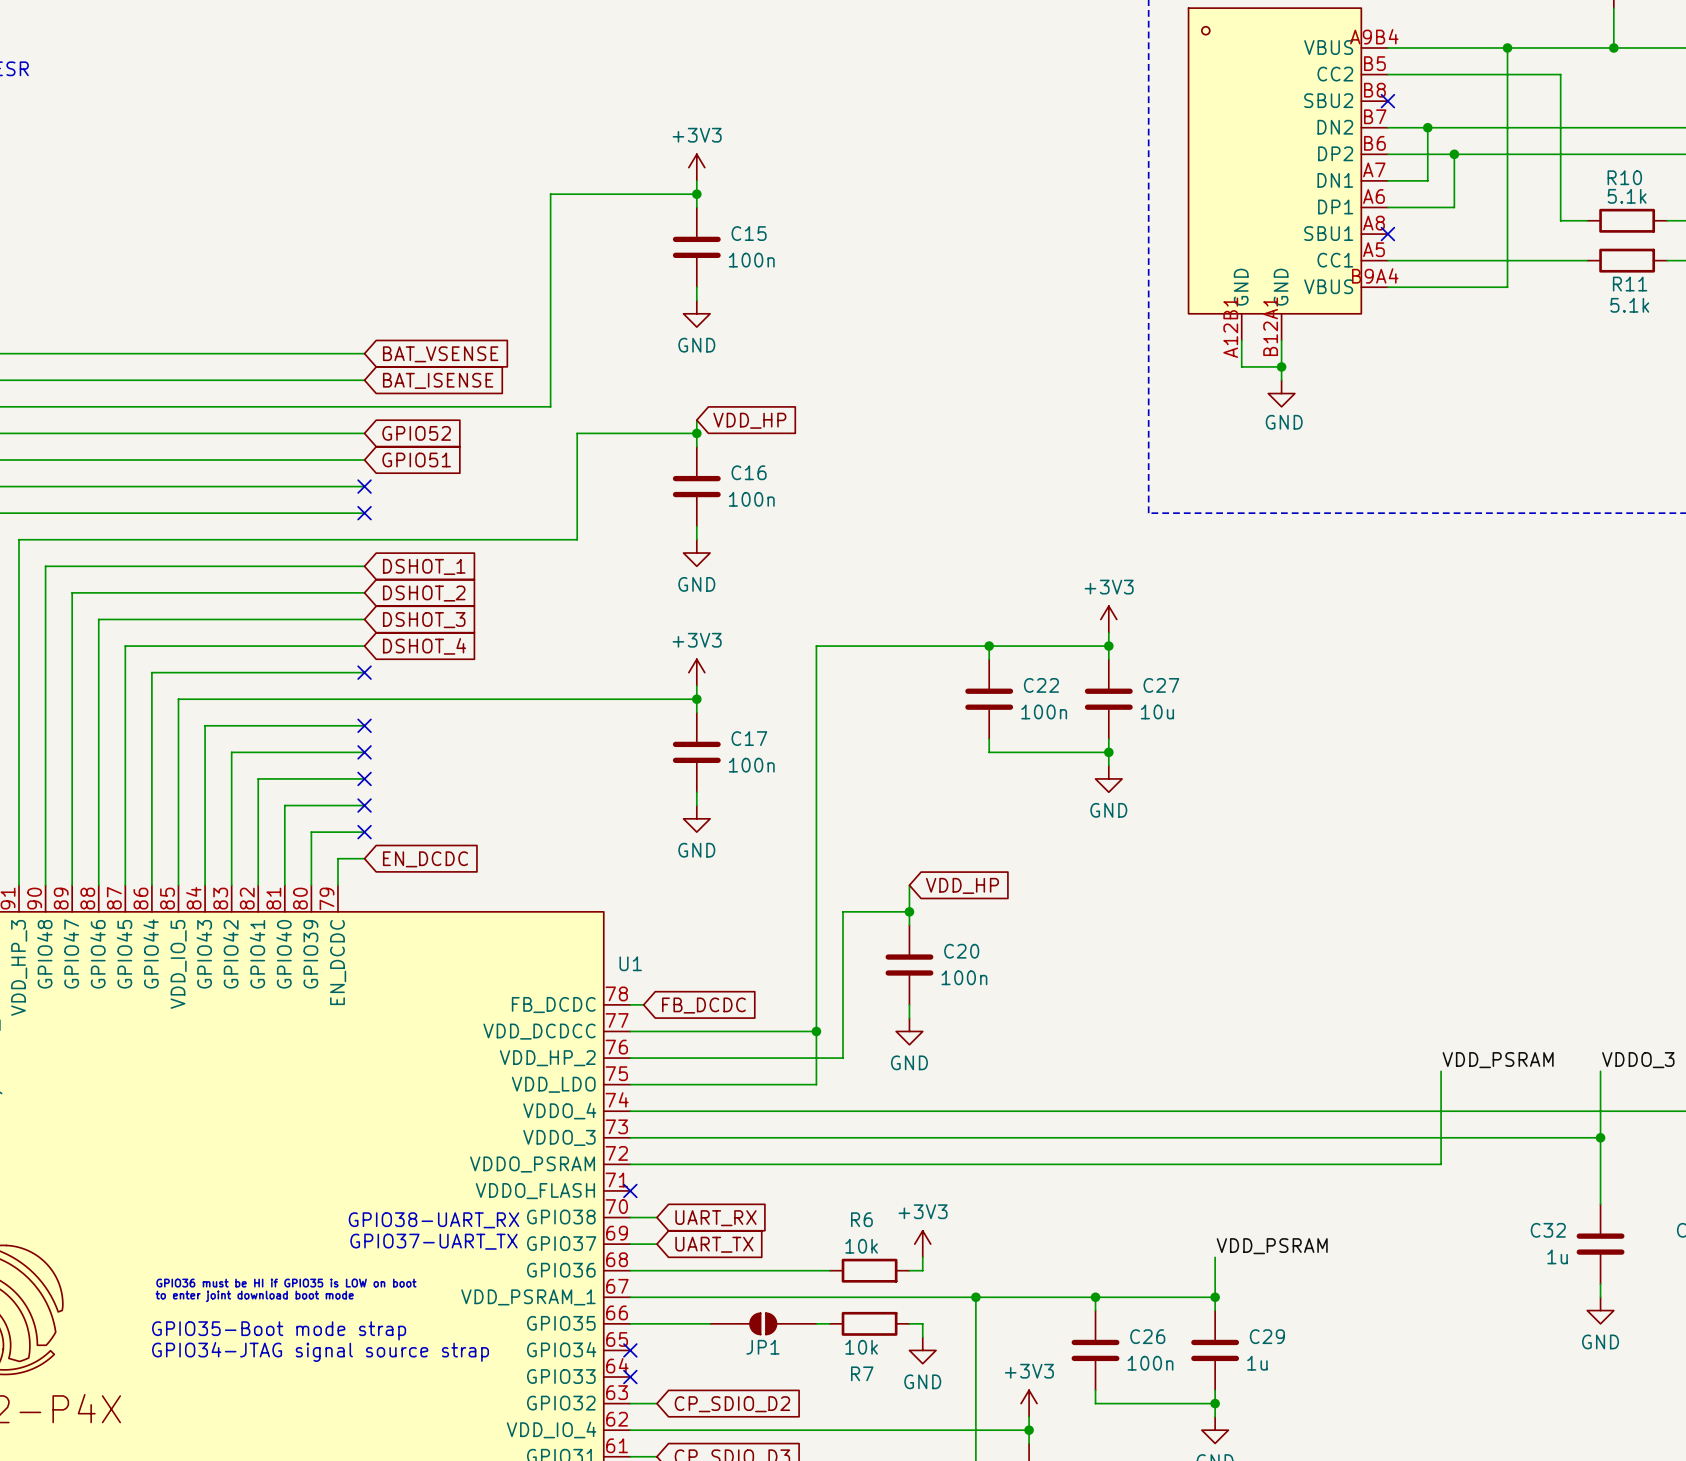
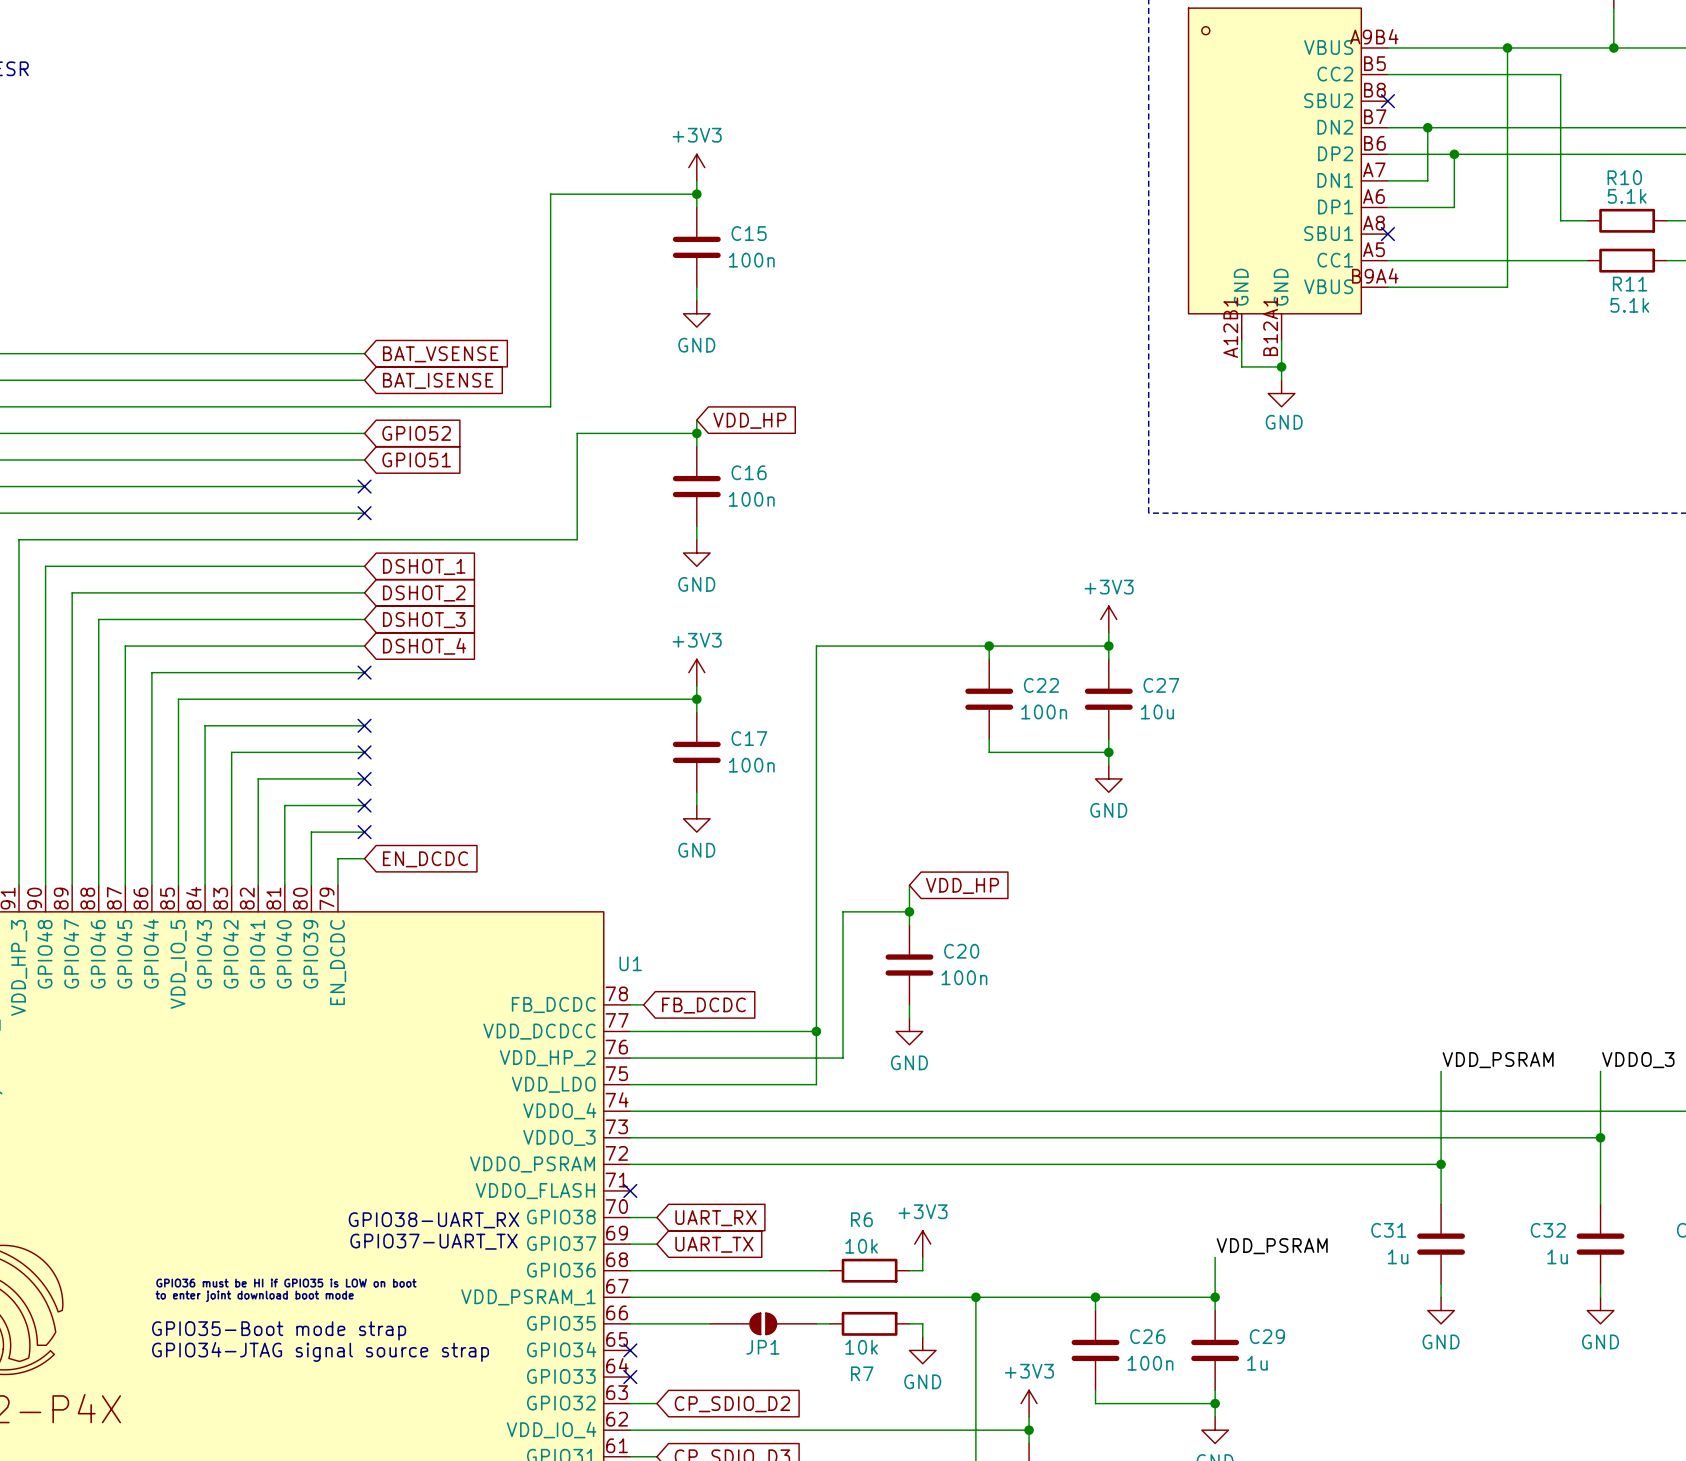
wire: none -> (1441, 1164) (1441, 1204)
junction: none -> (1441, 1164)
C31: none -> 1u (1441, 1244)
wire: none -> (1441, 1283) (1441, 1297)
power symbol: none -> GND (1441, 1310)

